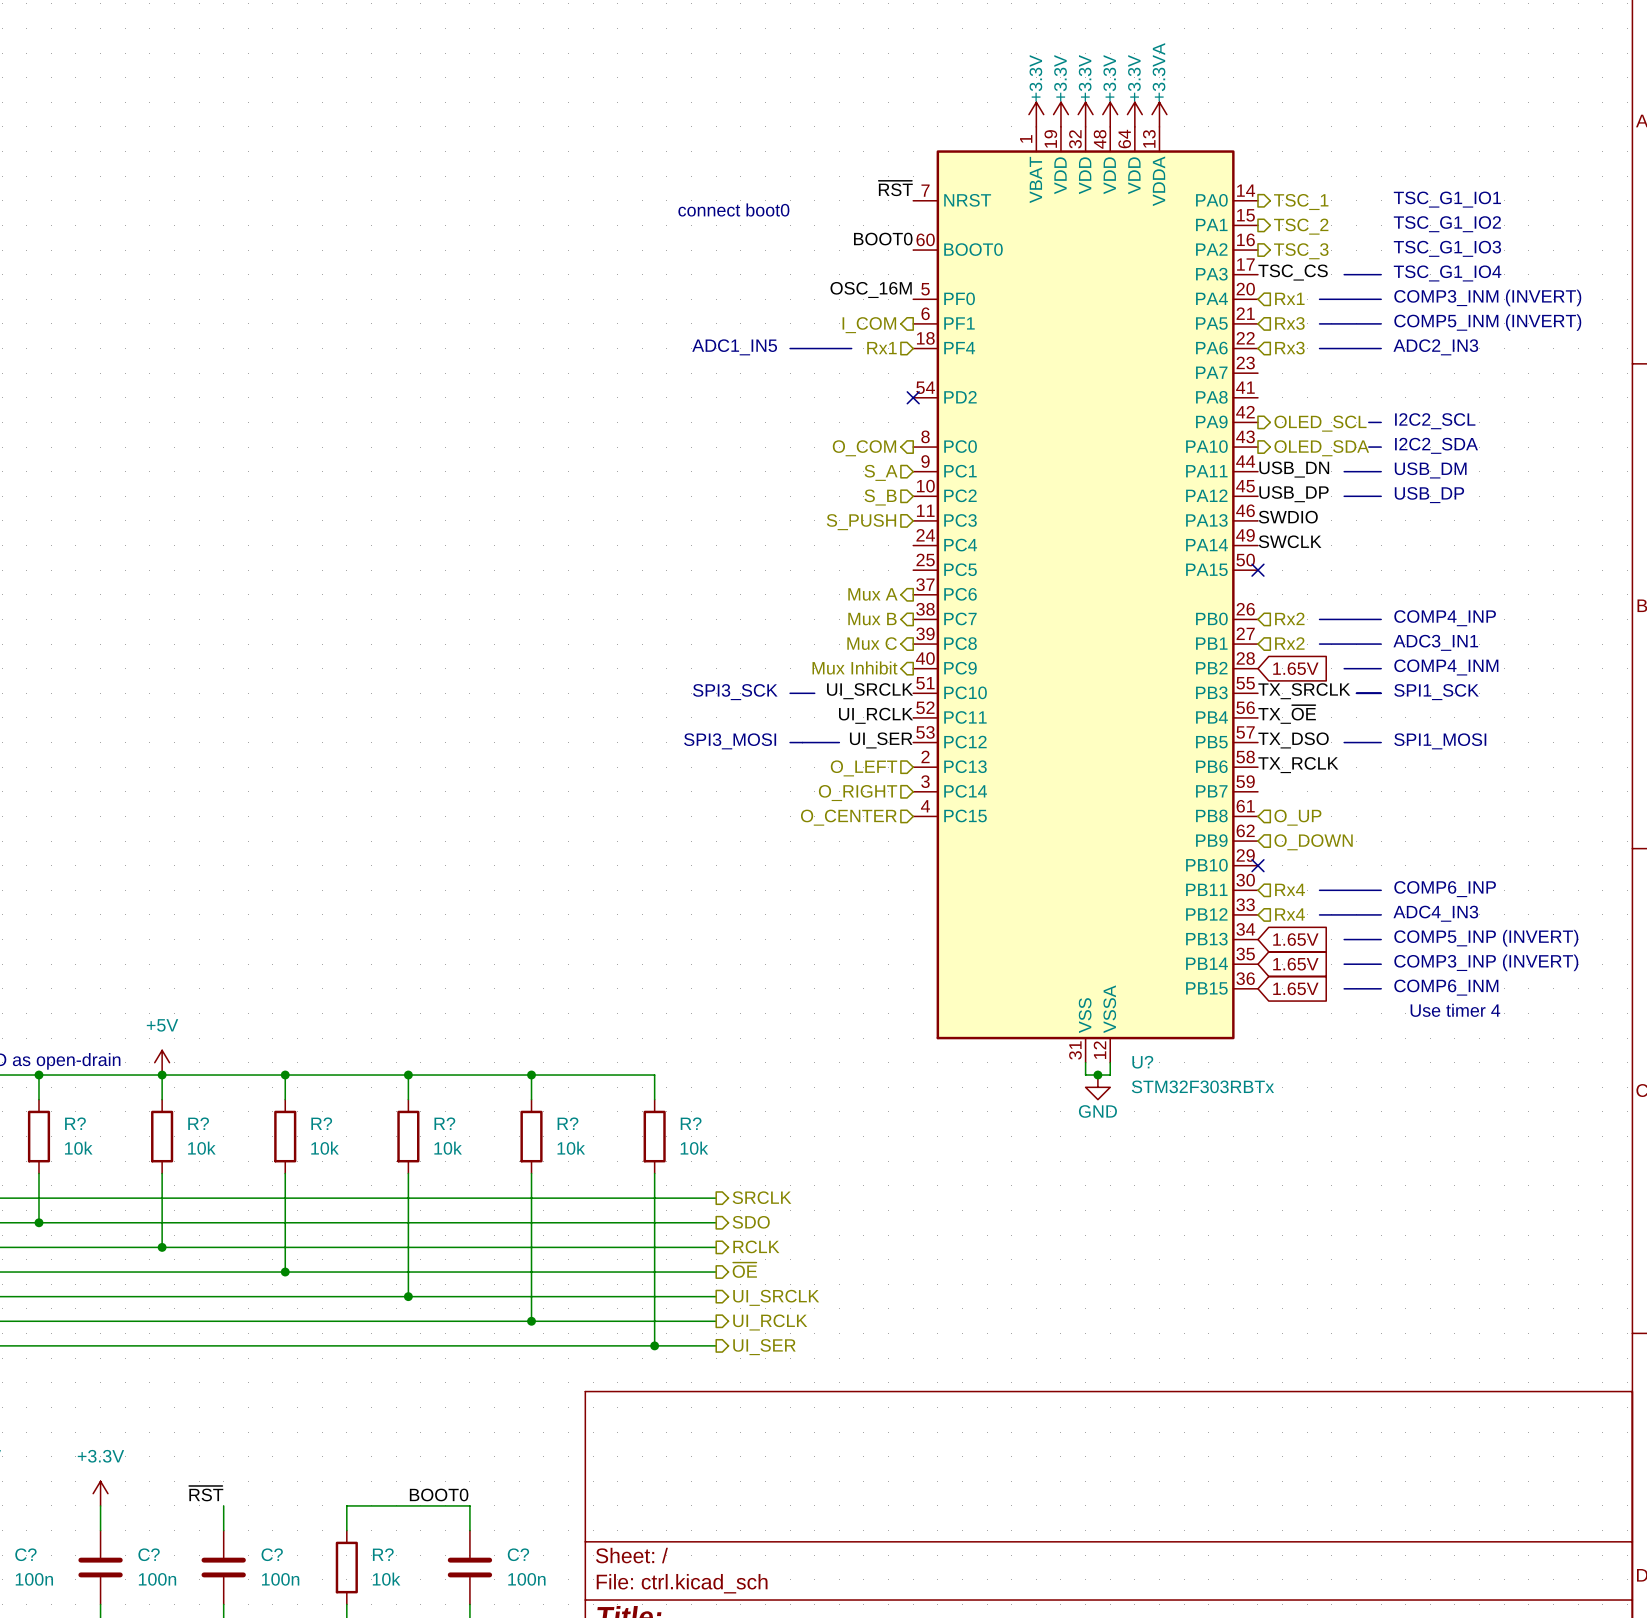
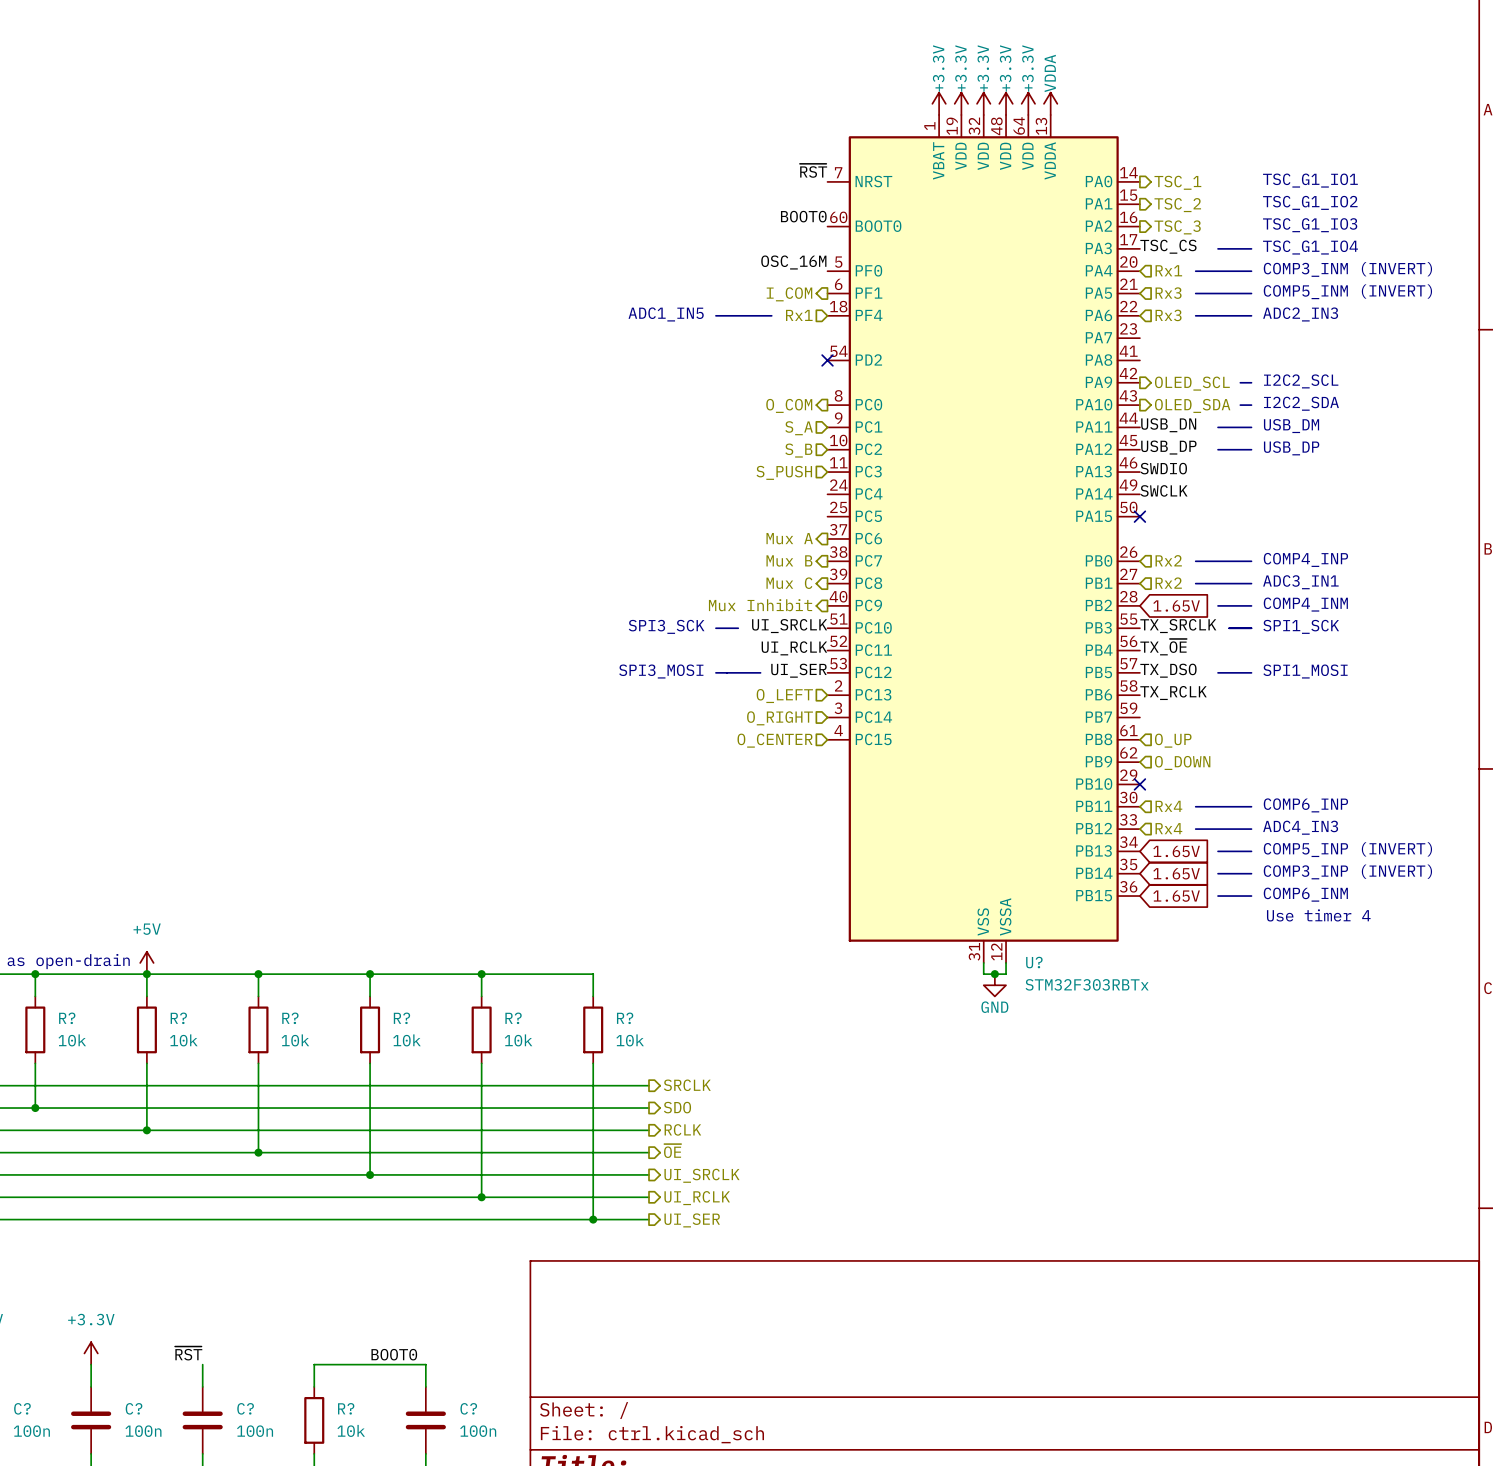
power symbol: +3.3VA (1159, 114) -> VDDA (1050, 103)
text: connect boot0 (733, 209) -> none

